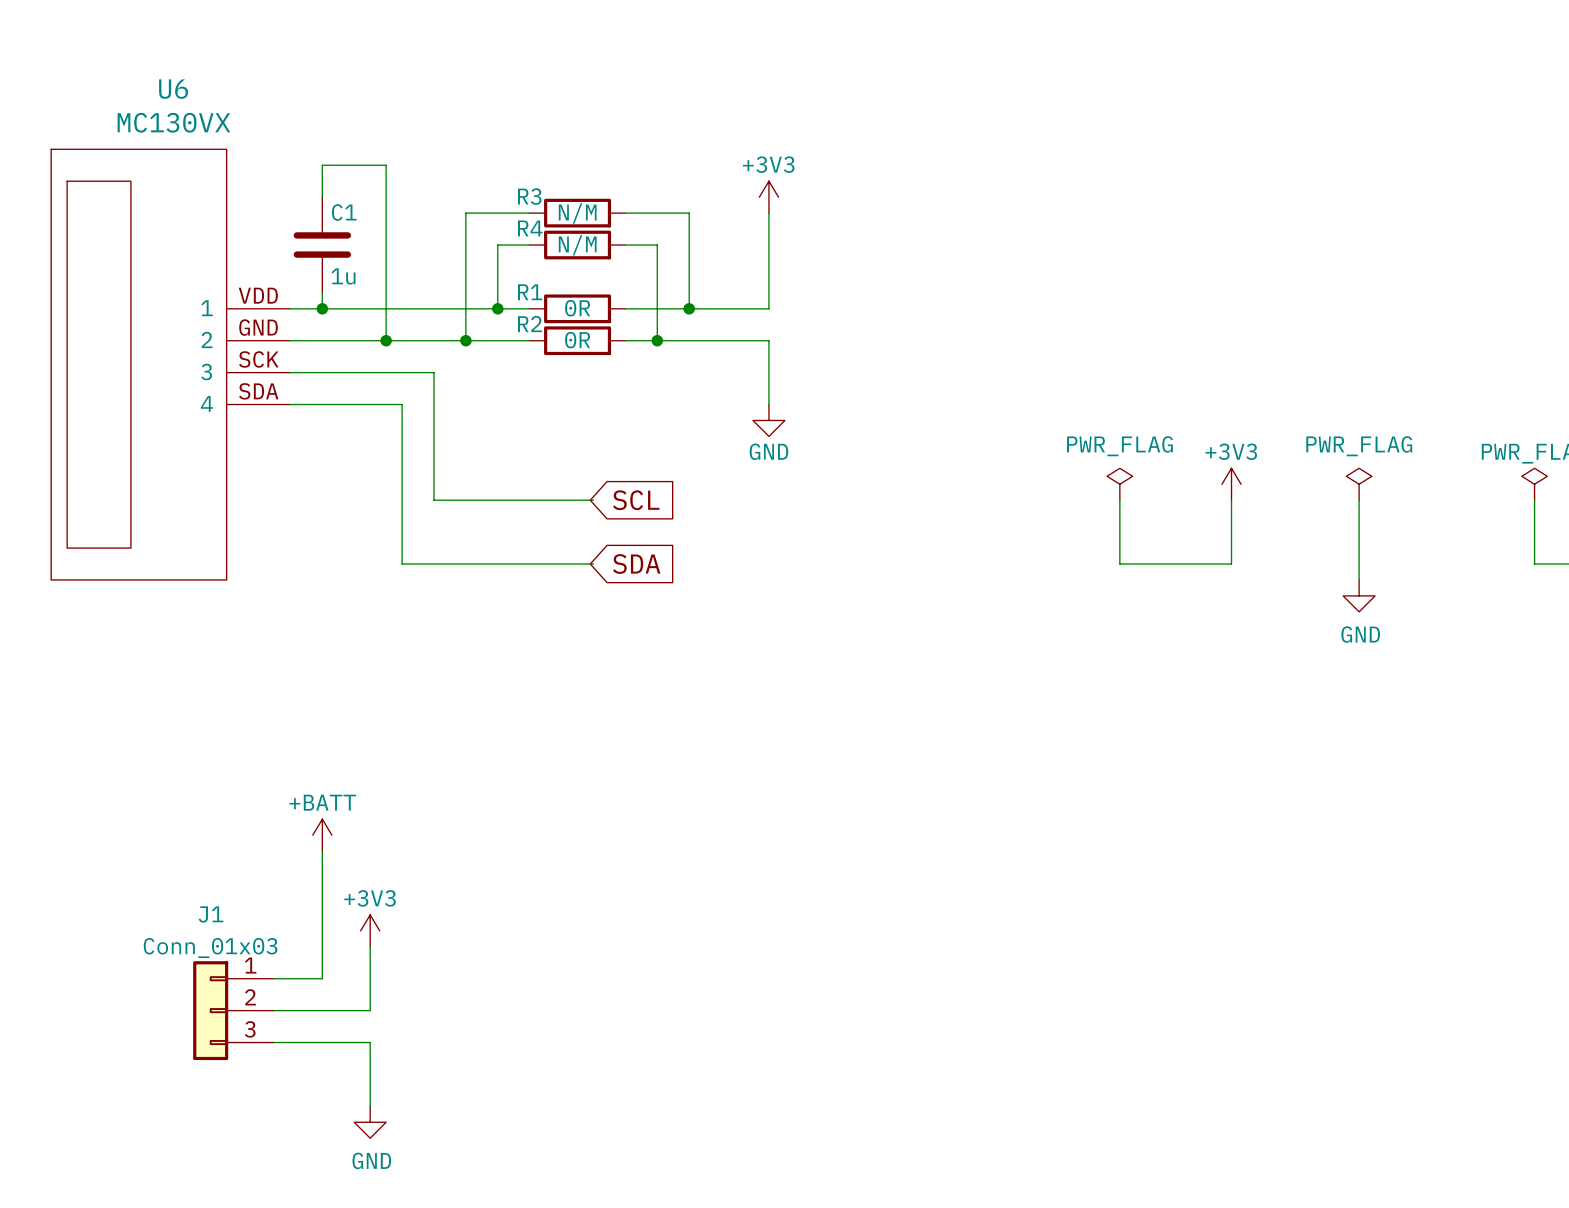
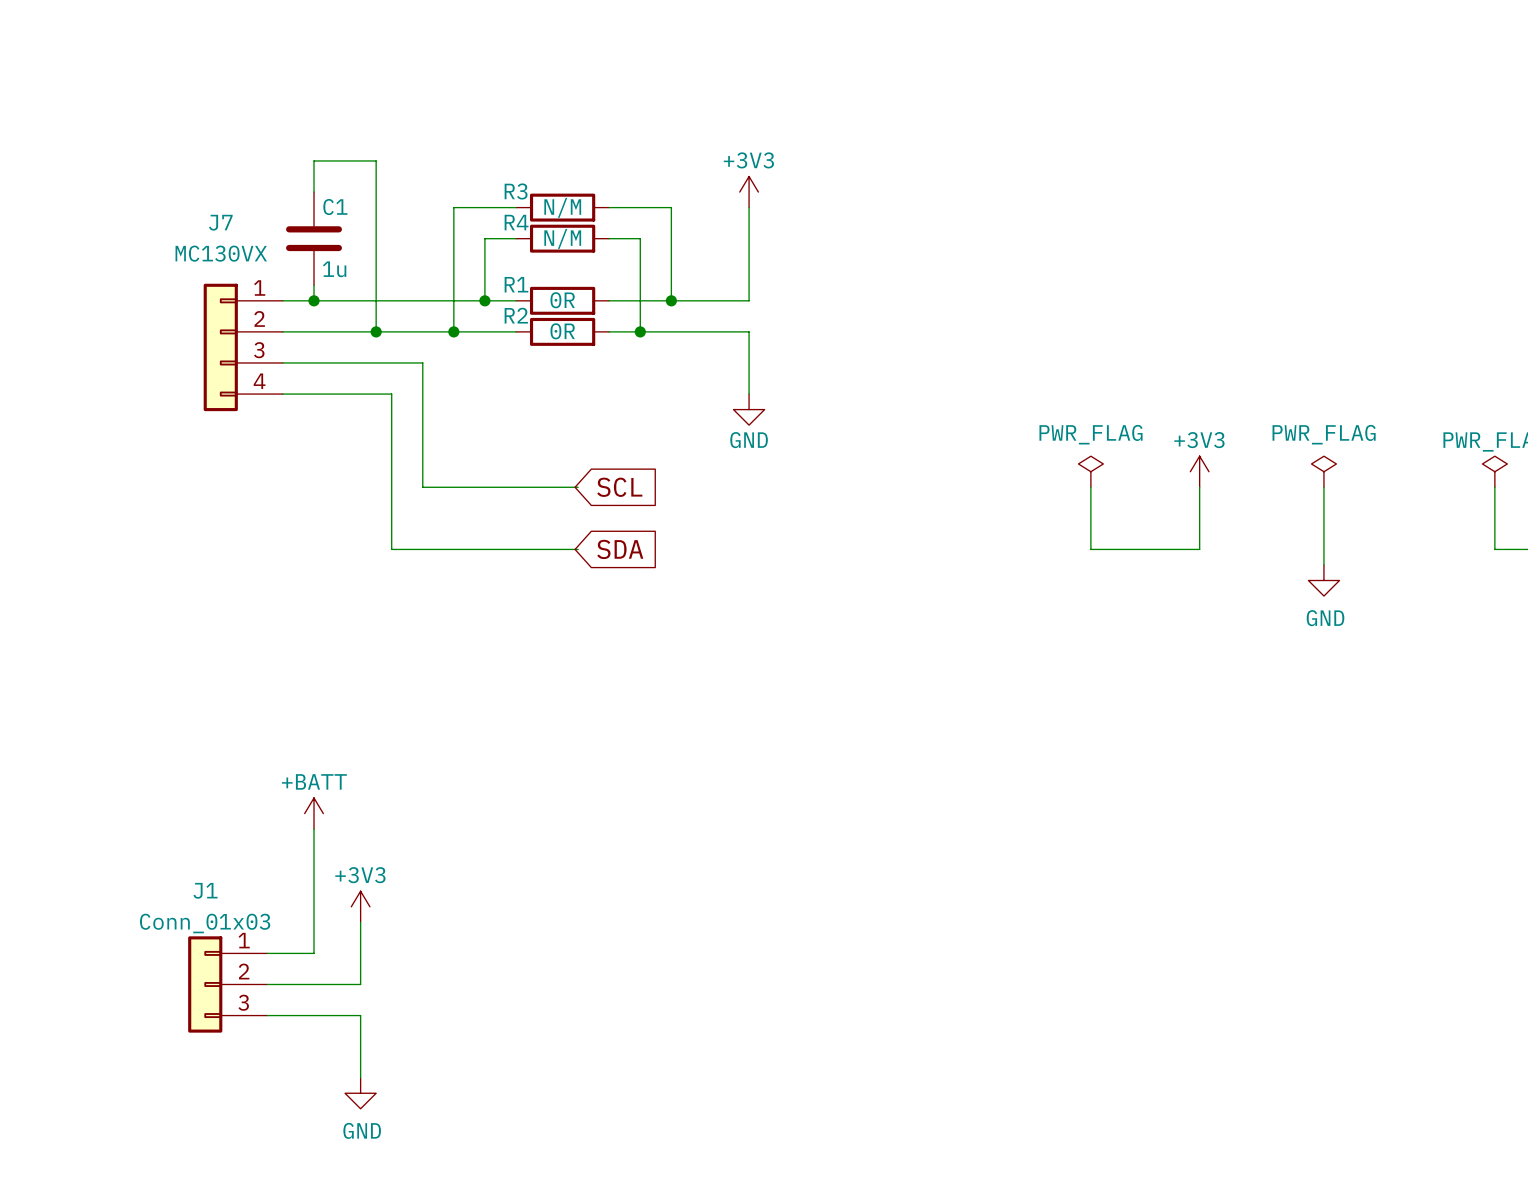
J7: none -> MC130VX (243, 347)
U6: MC130VX (170, 364) -> none

